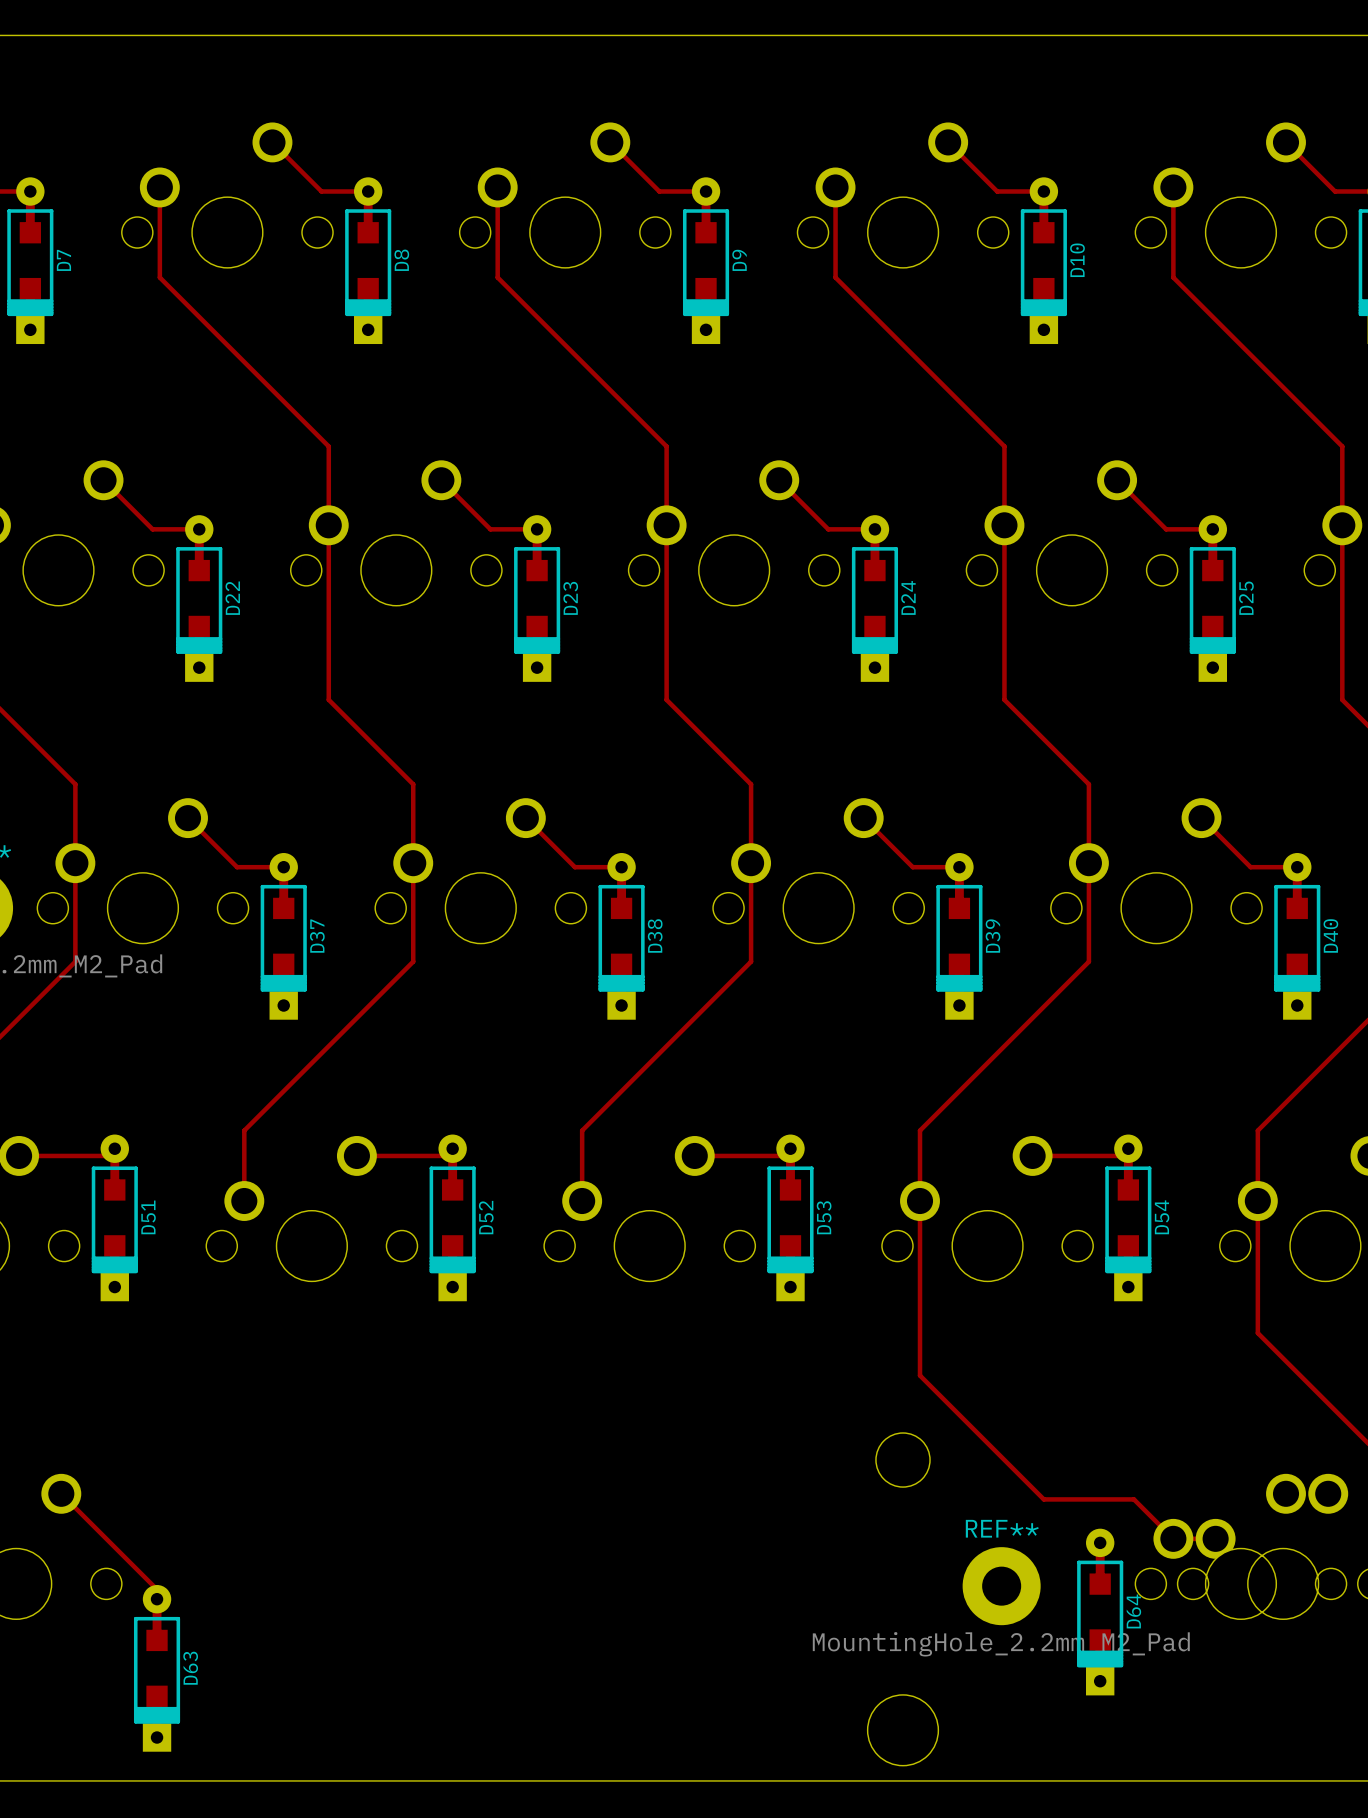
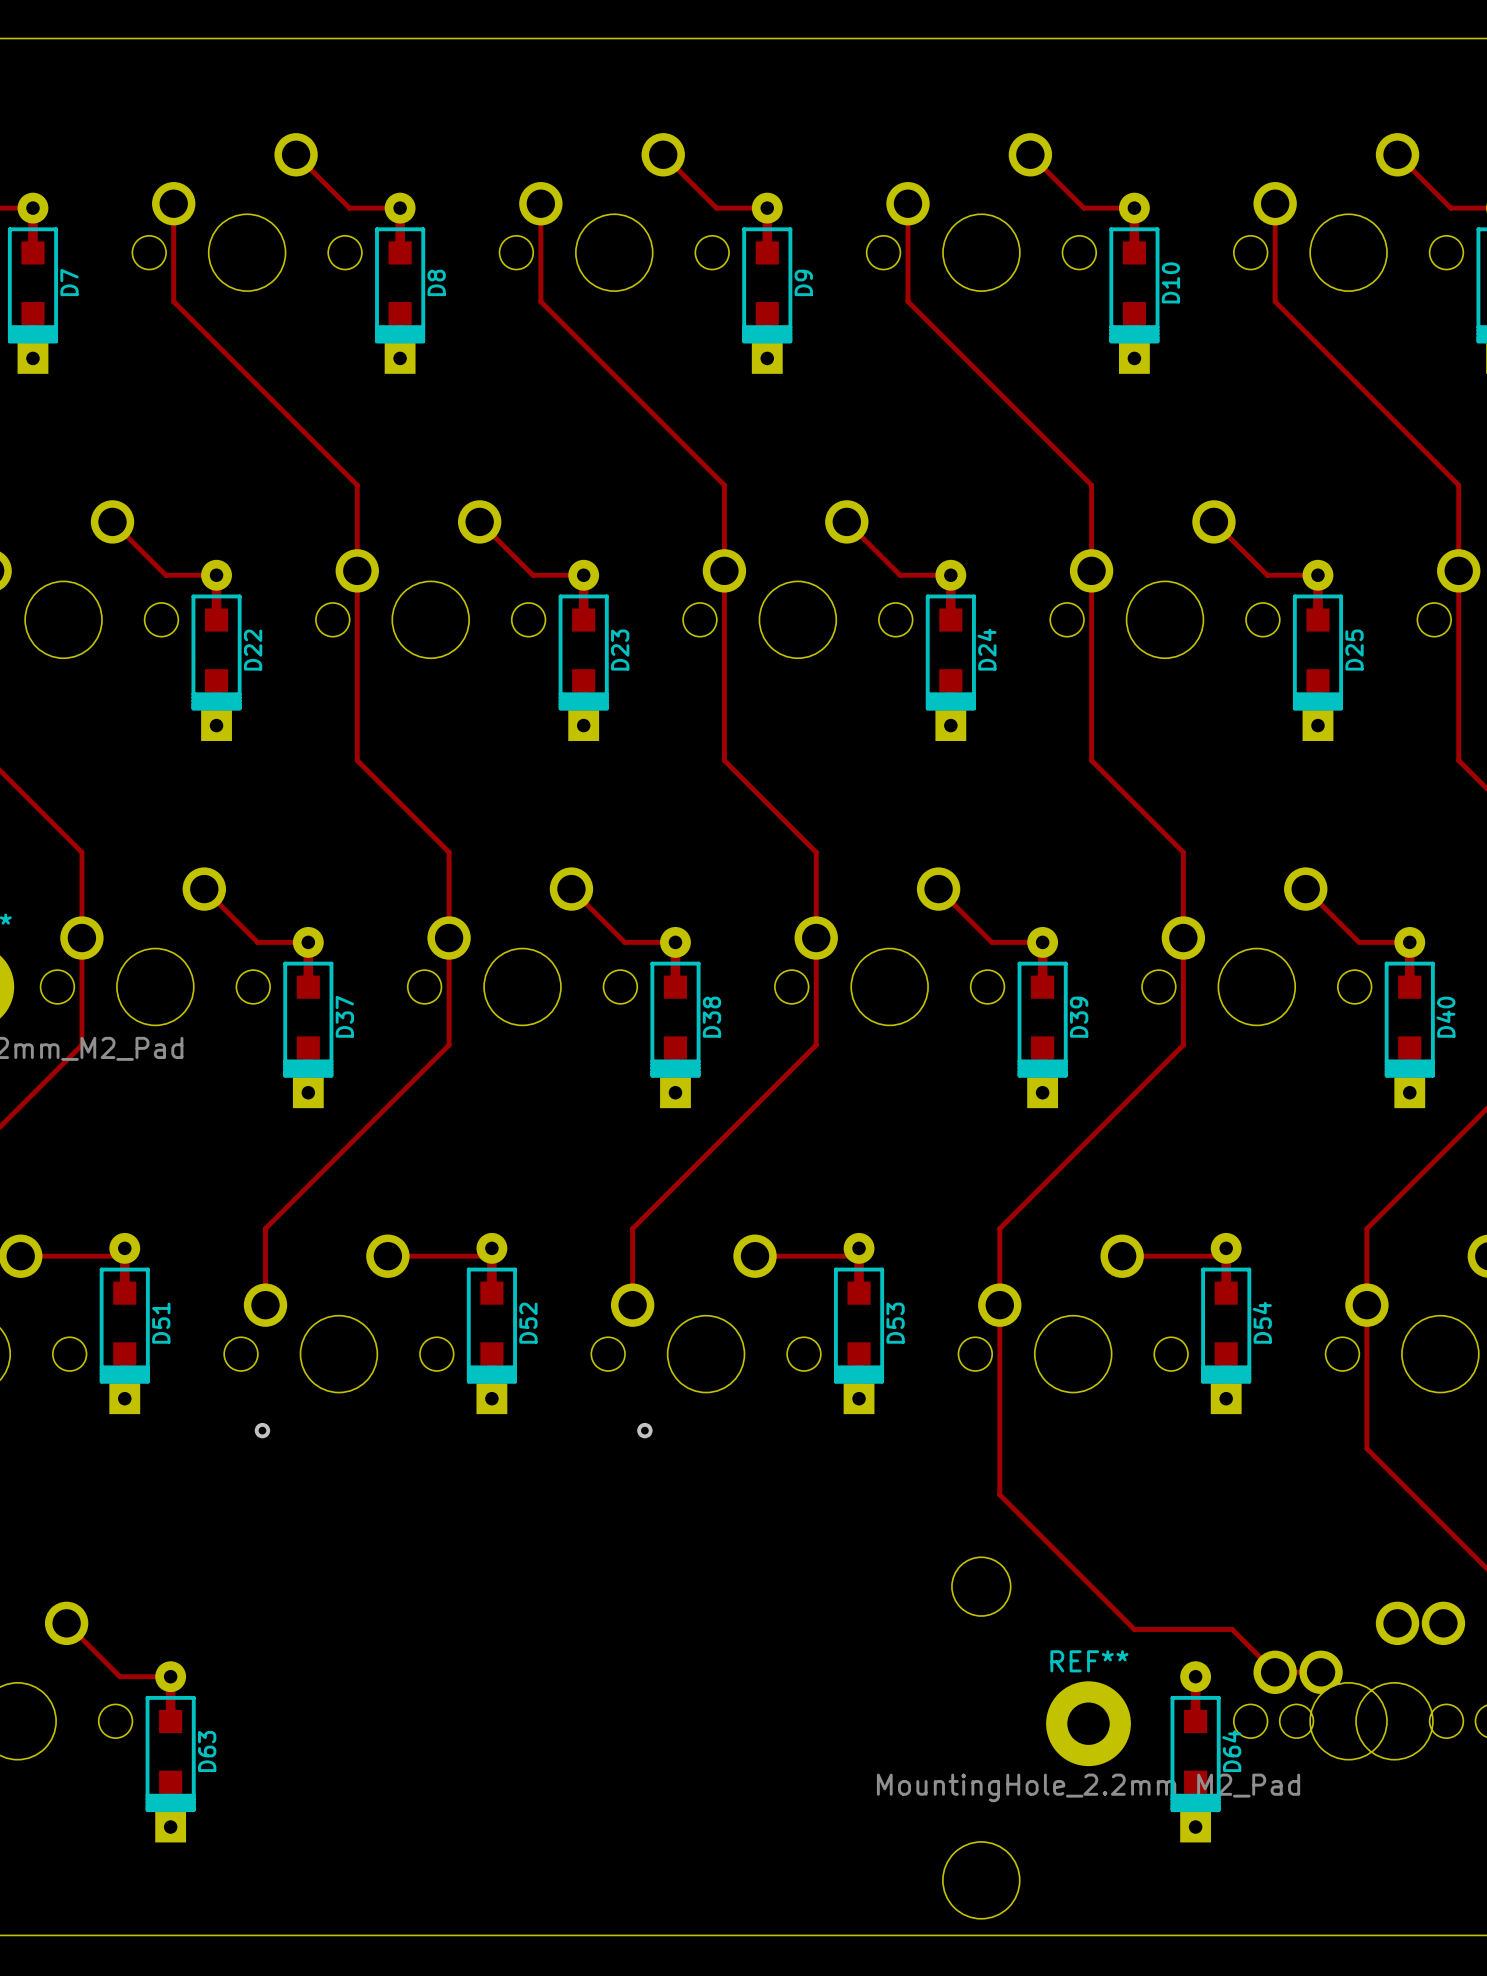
via: none -> (262, 1430)
via: none -> (644, 1430)
track: (110, 1542) (157, 1589) (157, 1599) -> (119, 1676) (170, 1676)
D63 position: (157, 1668) -> (170, 1751)

